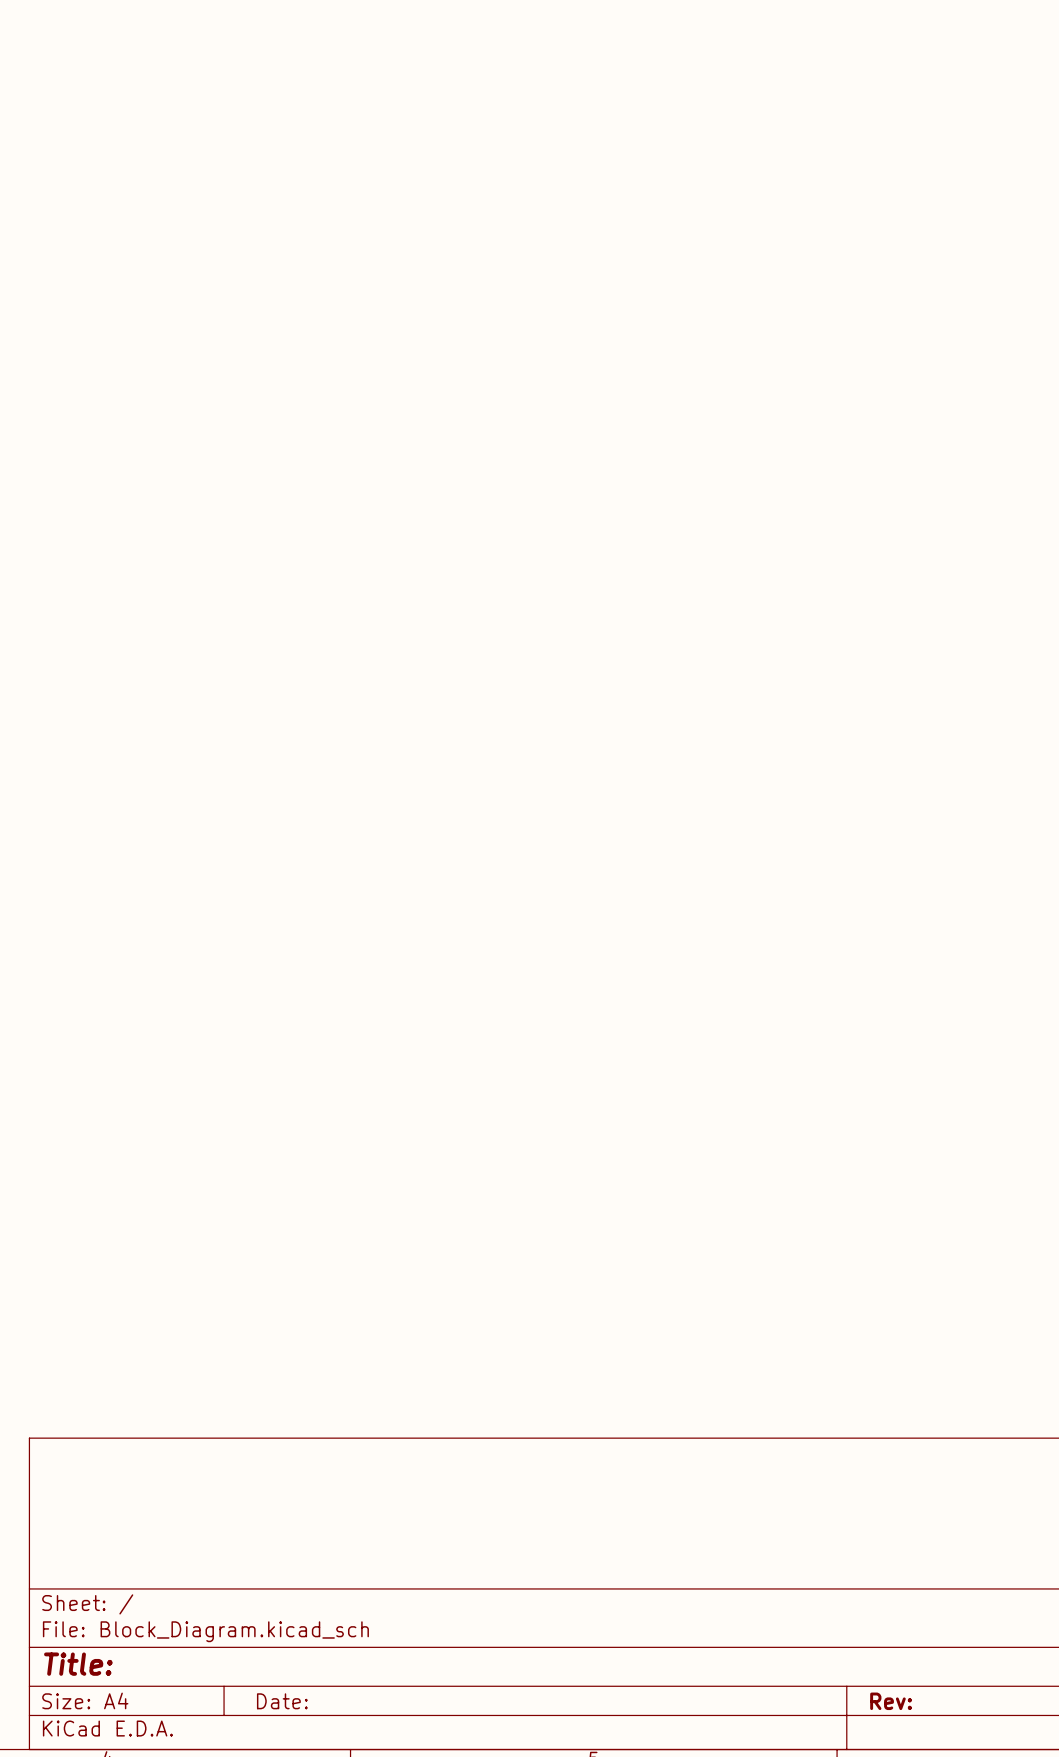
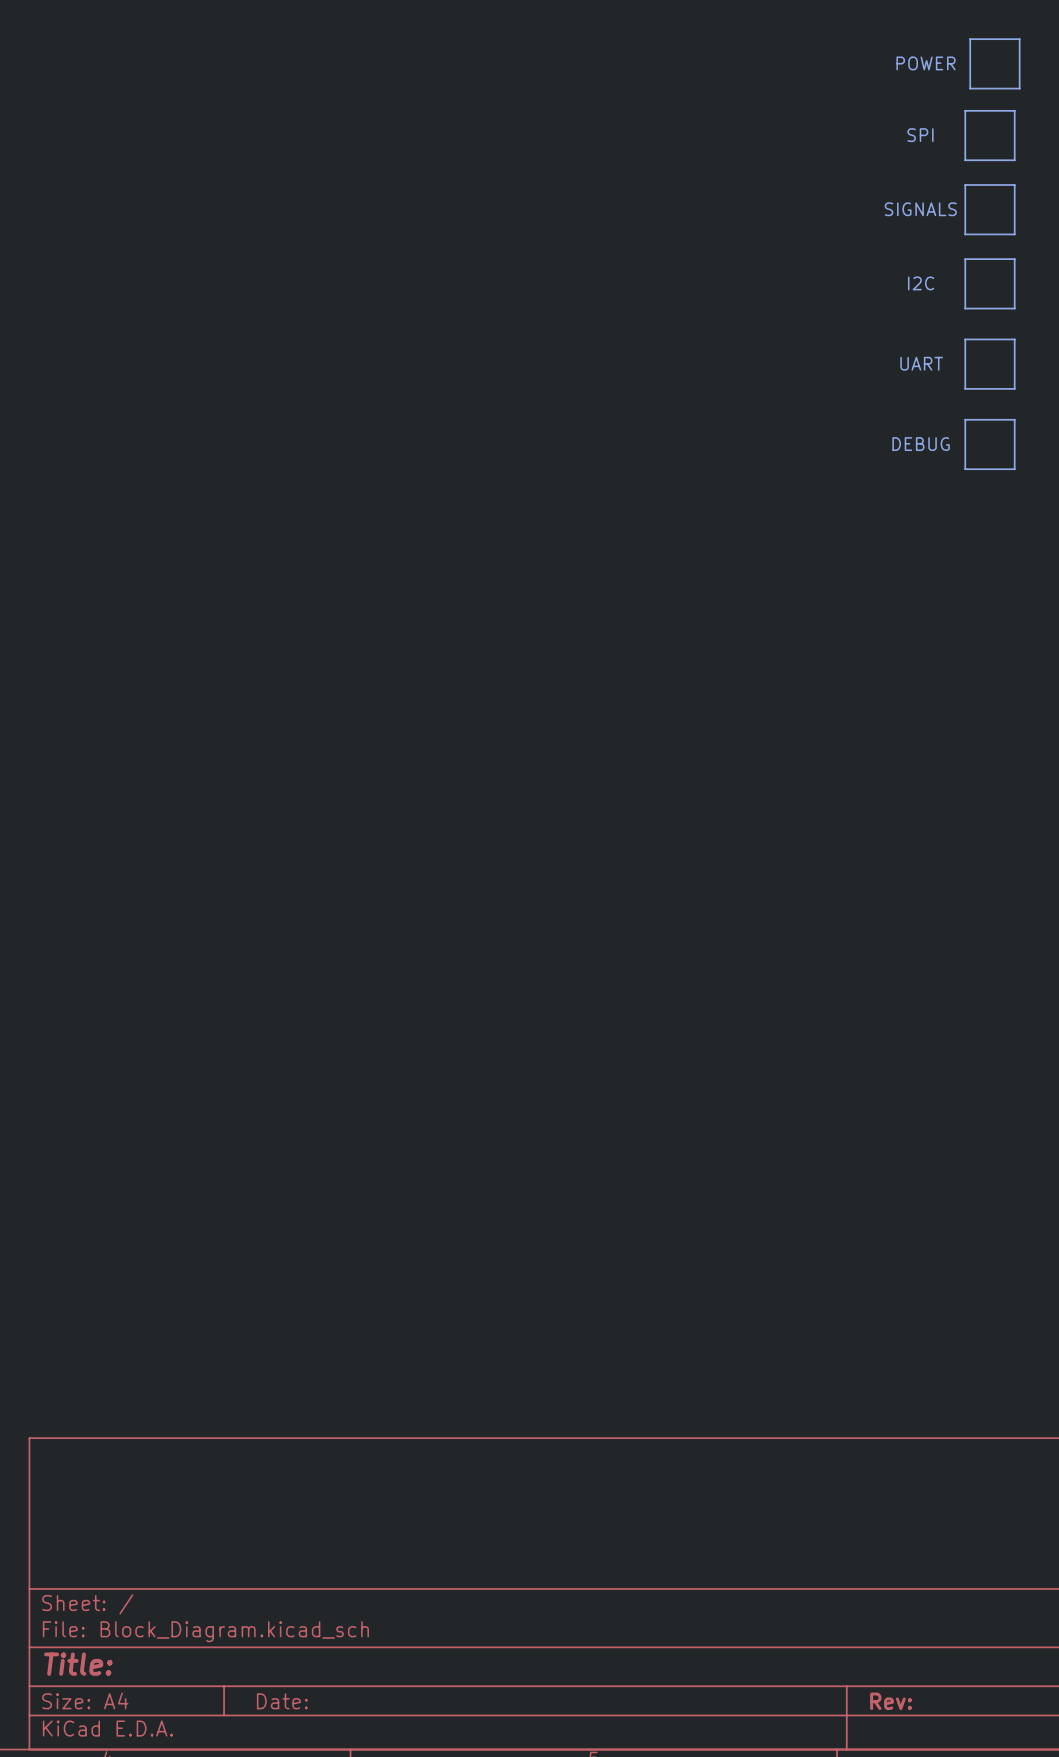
line: none -> (970, 39) (1019, 39) (1019, 88) (970, 88) (970, 39)
text: none -> POWER (926, 63)
line: none -> (965, 110) (1014, 110) (1014, 160) (965, 160) (965, 110)
text: none -> SPI (920, 135)
line: none -> (965, 184) (965, 234) (1014, 234) (1014, 184) (965, 184)
text: none -> SIGNALS (920, 209)
line: none -> (965, 259) (965, 308) (1014, 308) (1014, 259) (965, 259)
text: none -> I2C (921, 283)
line: none -> (965, 339) (965, 388) (1014, 388) (1014, 339) (965, 339)
text: none -> UART (921, 363)
line: none -> (965, 419) (965, 469) (1014, 469) (1014, 419) (965, 419)
text: none -> DEBUG (921, 444)

